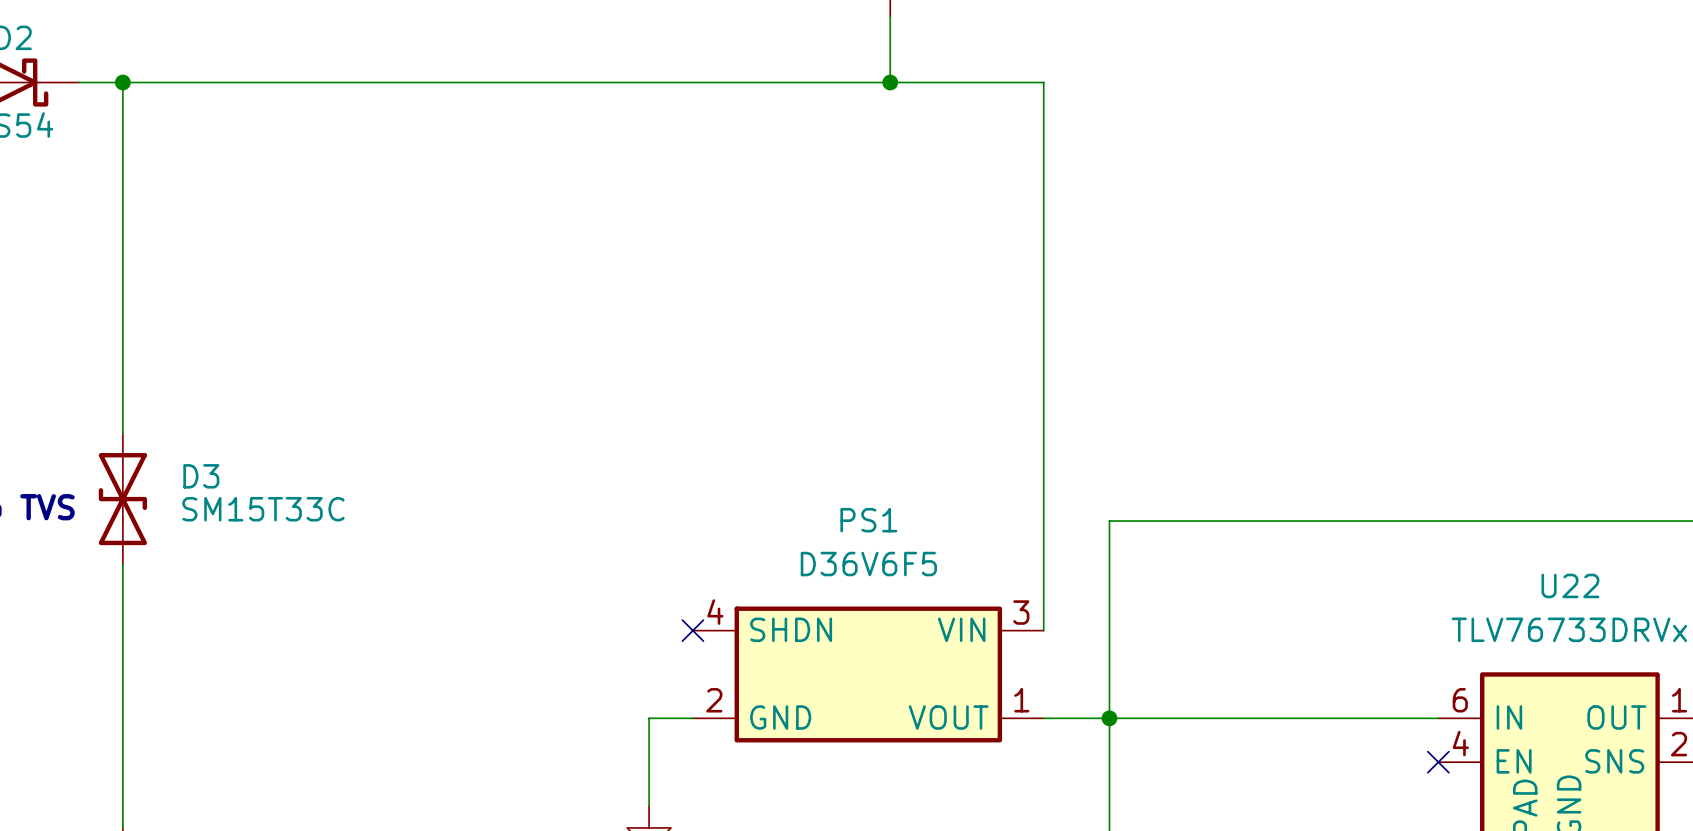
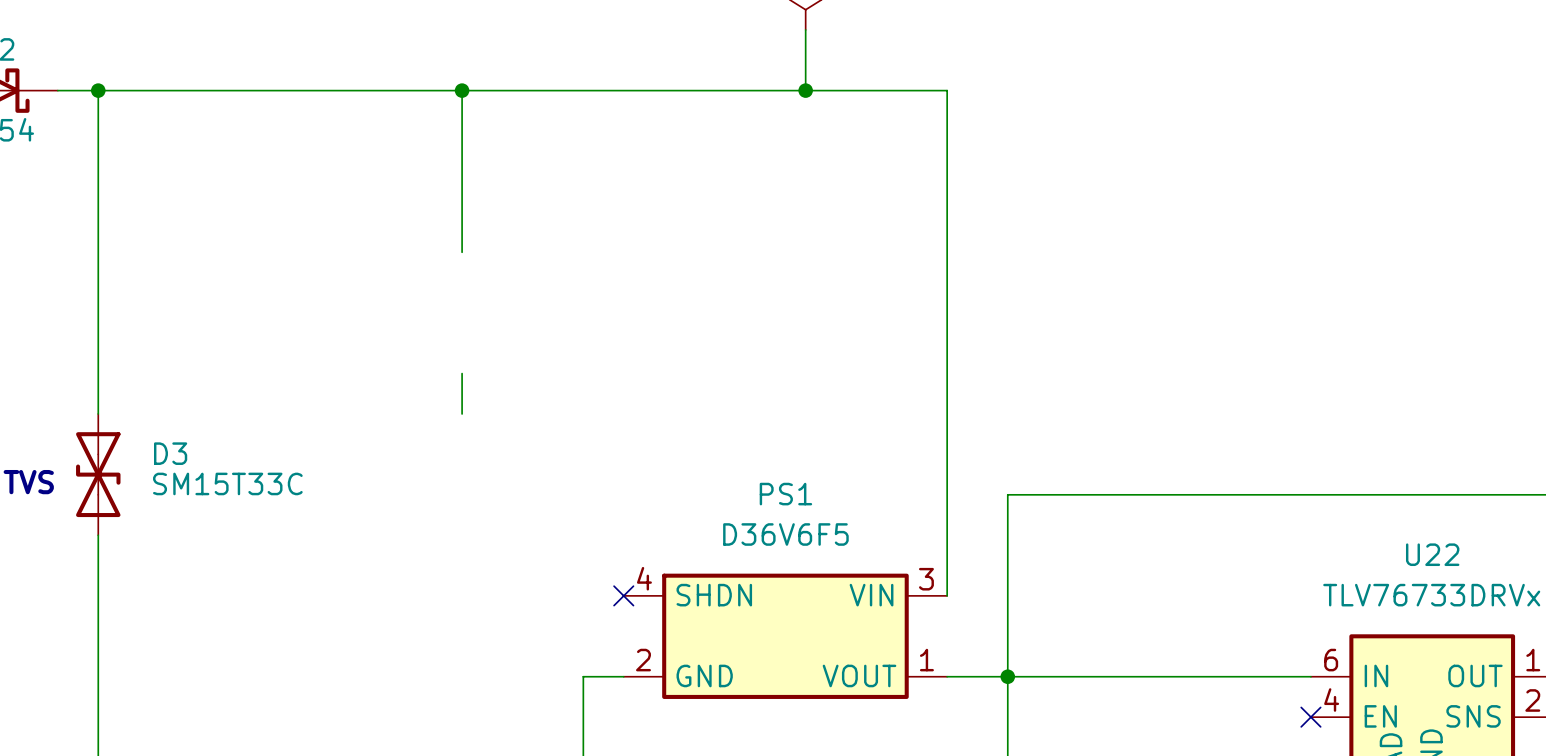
wire: none -> (462, 90) (462, 252)
junction: none -> (462, 90)
wire: none -> (462, 373) (462, 413)

